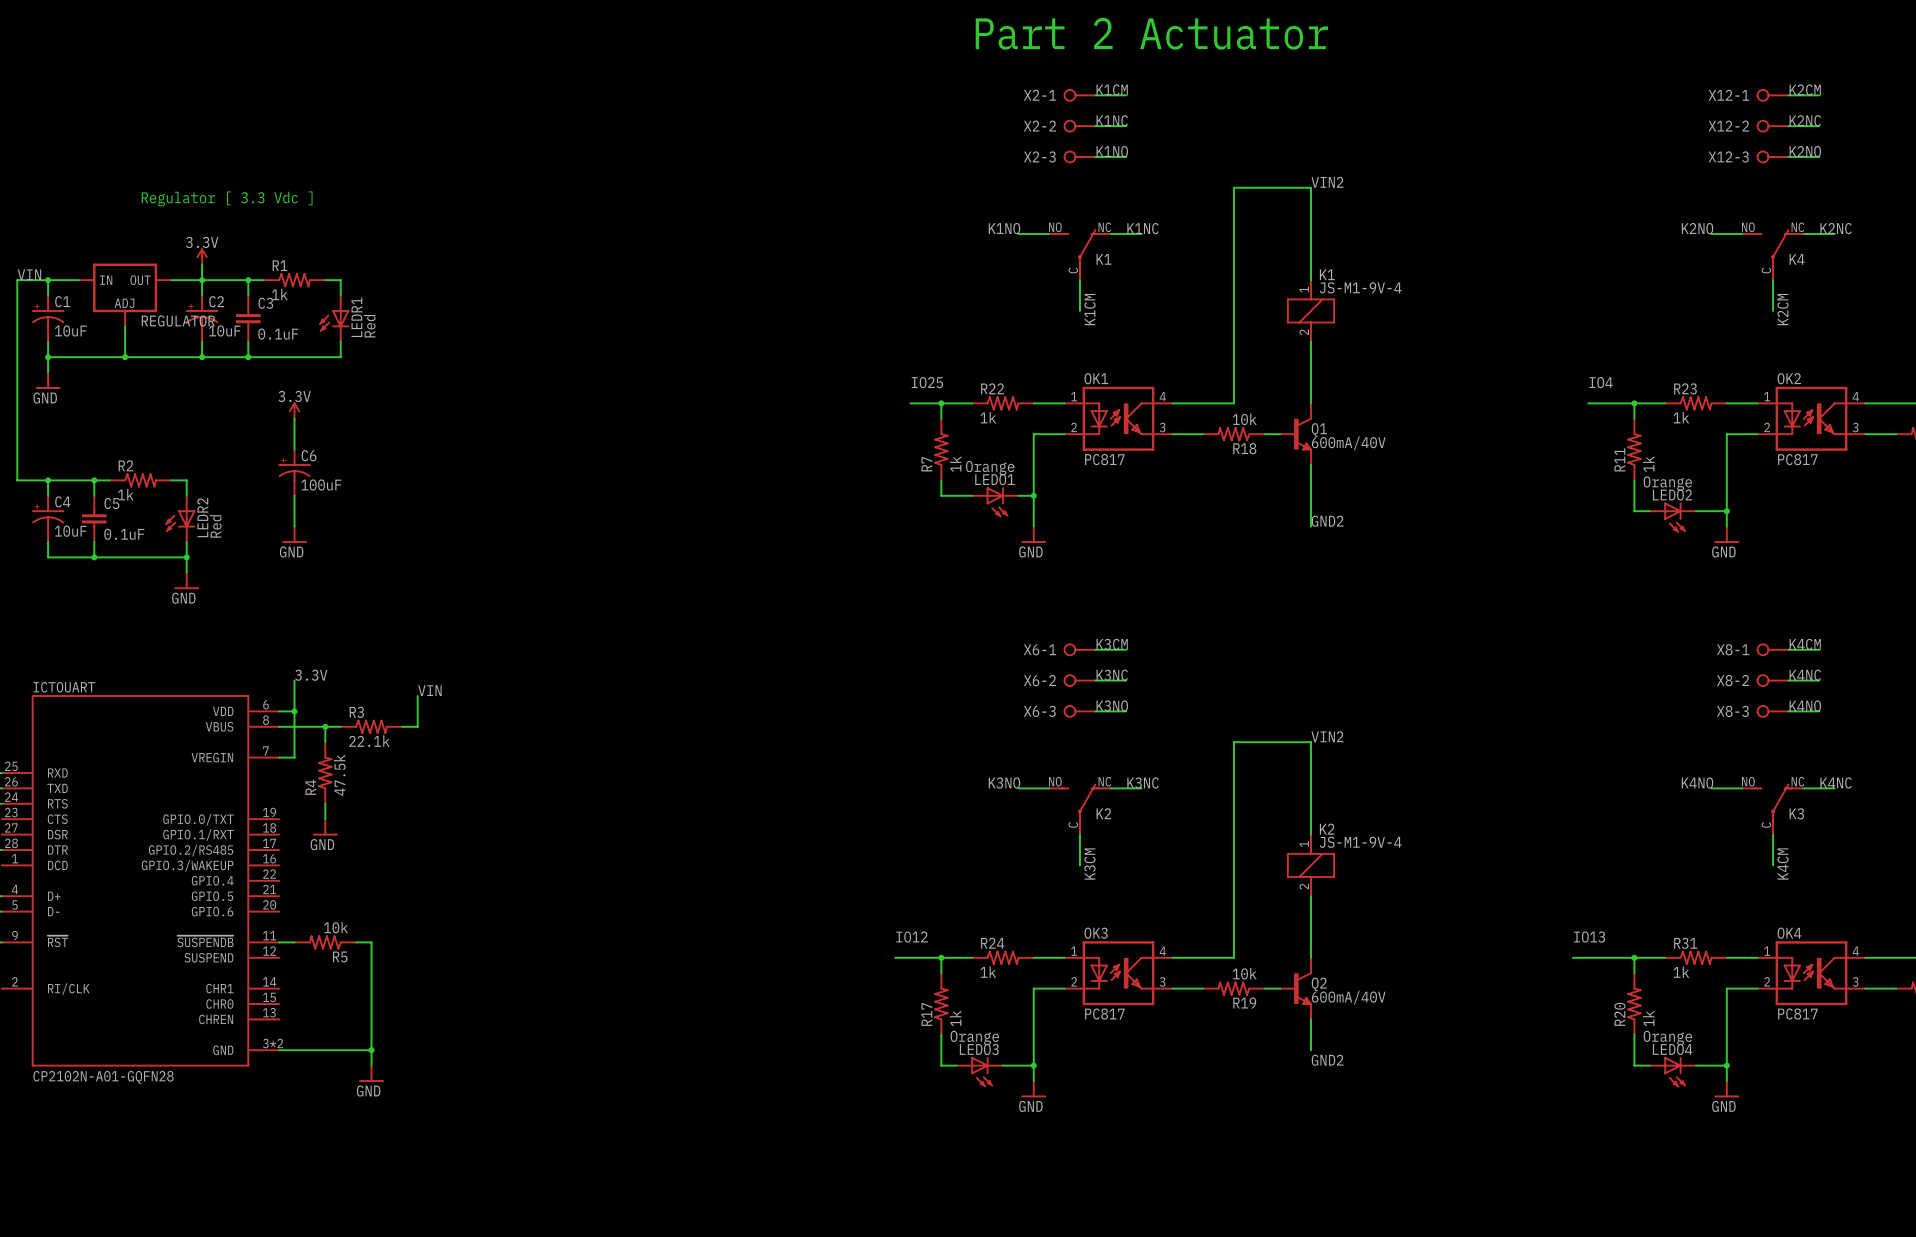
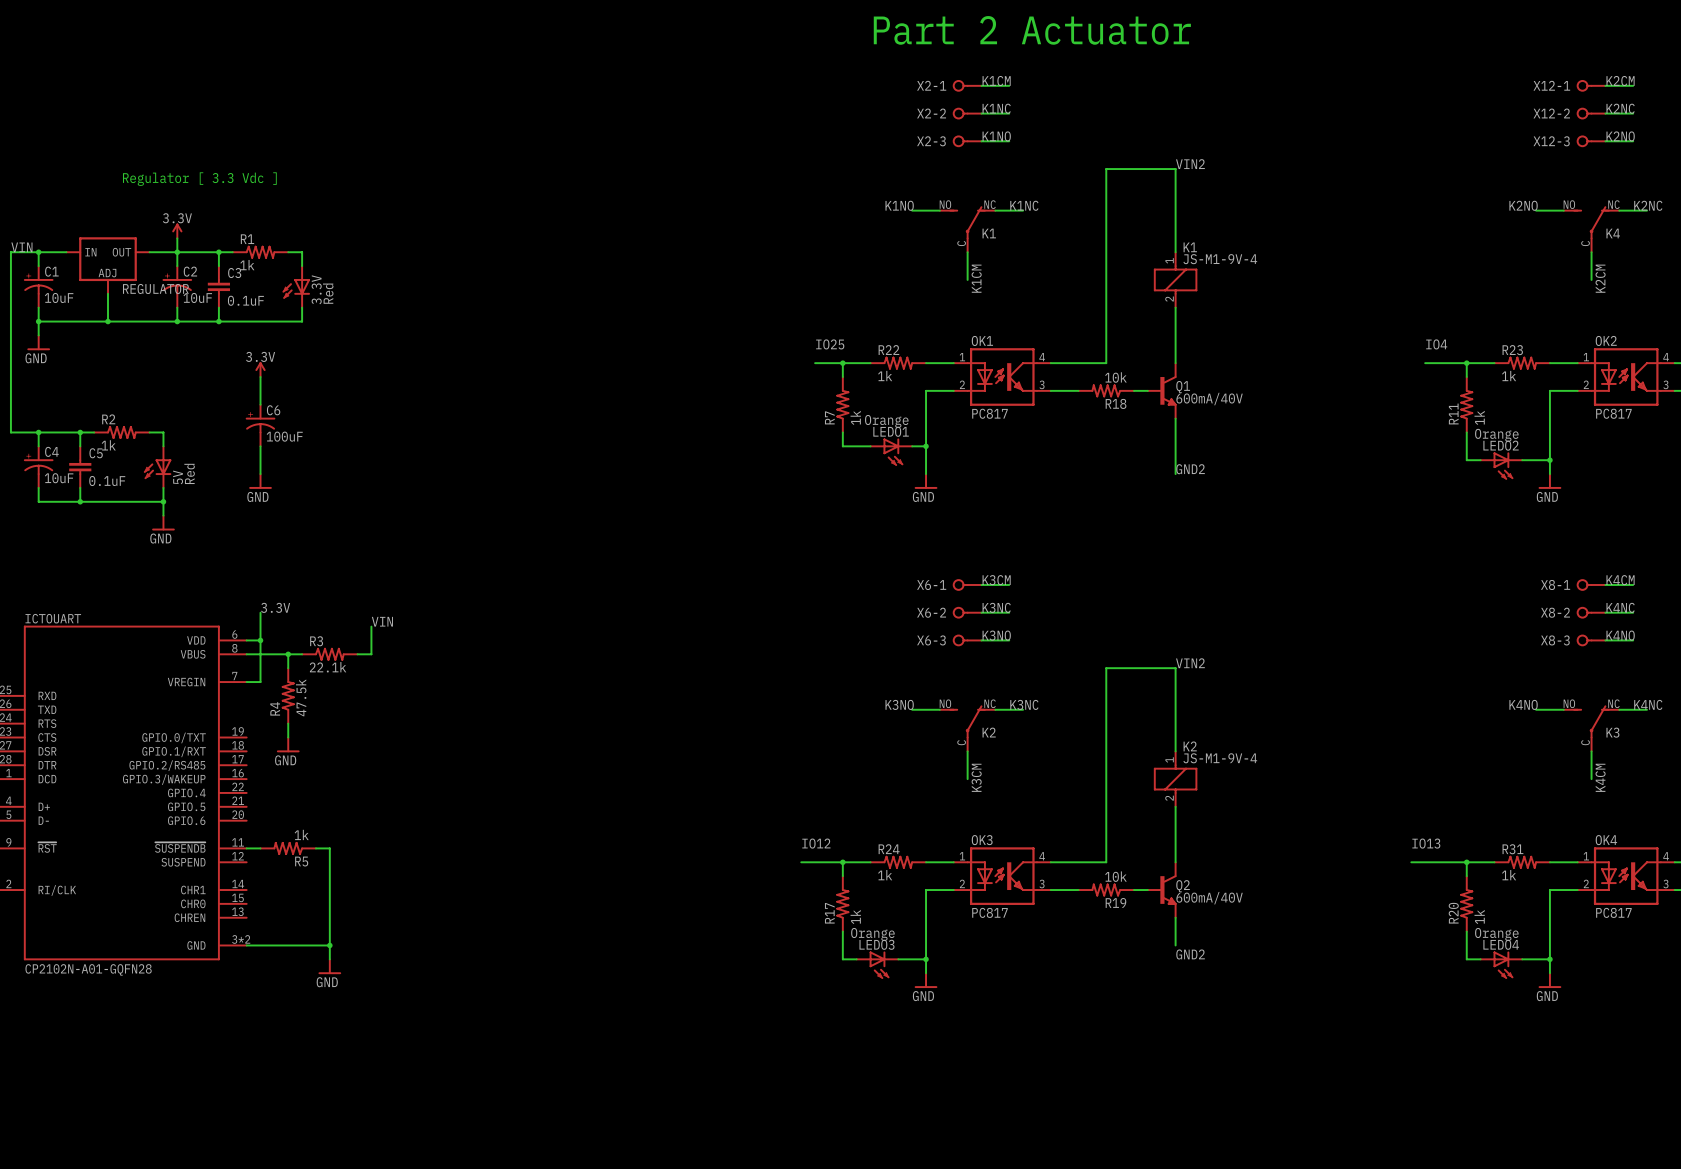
LEDR1 name: LEDR1 (356, 317) -> 3.3V (316, 289)
LEDR2 name: LEDR2 (202, 517) -> 5V (178, 477)
R5 value: 10k (336, 927) -> 1k (301, 834)

